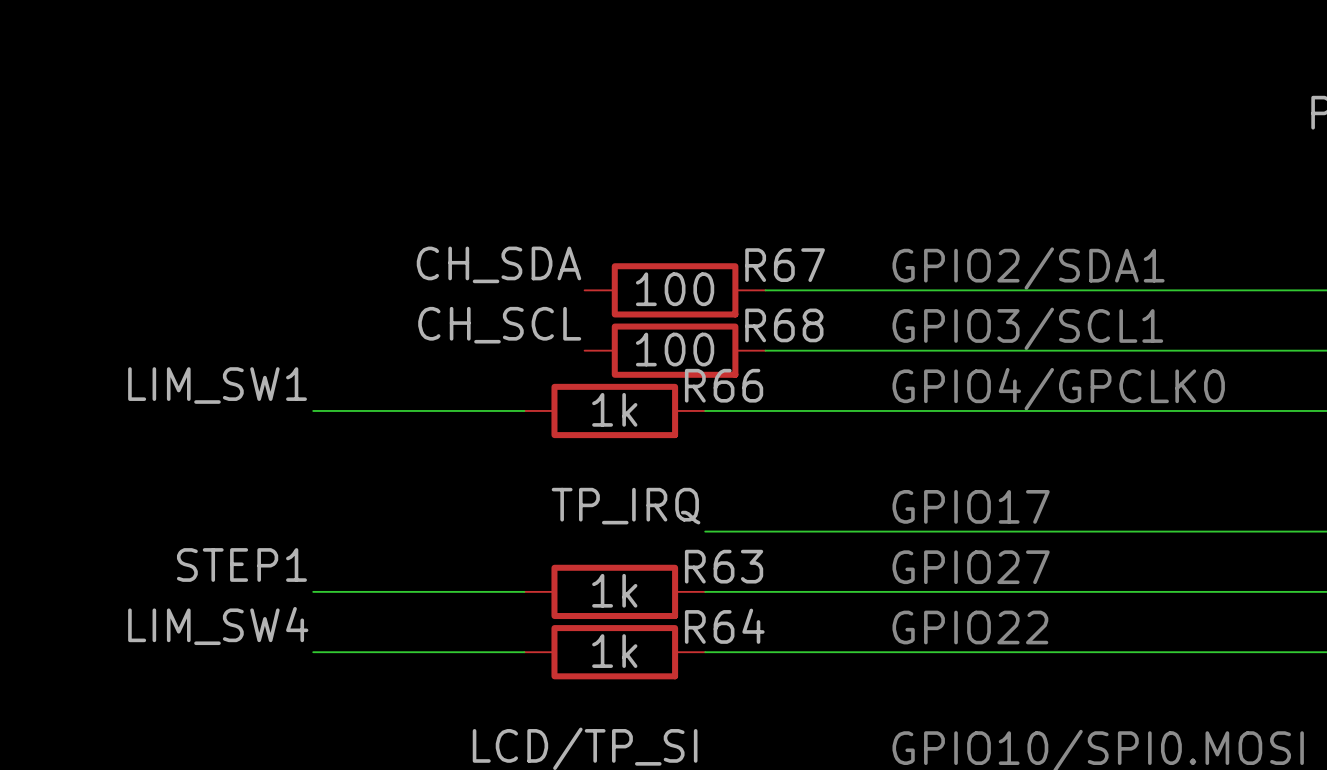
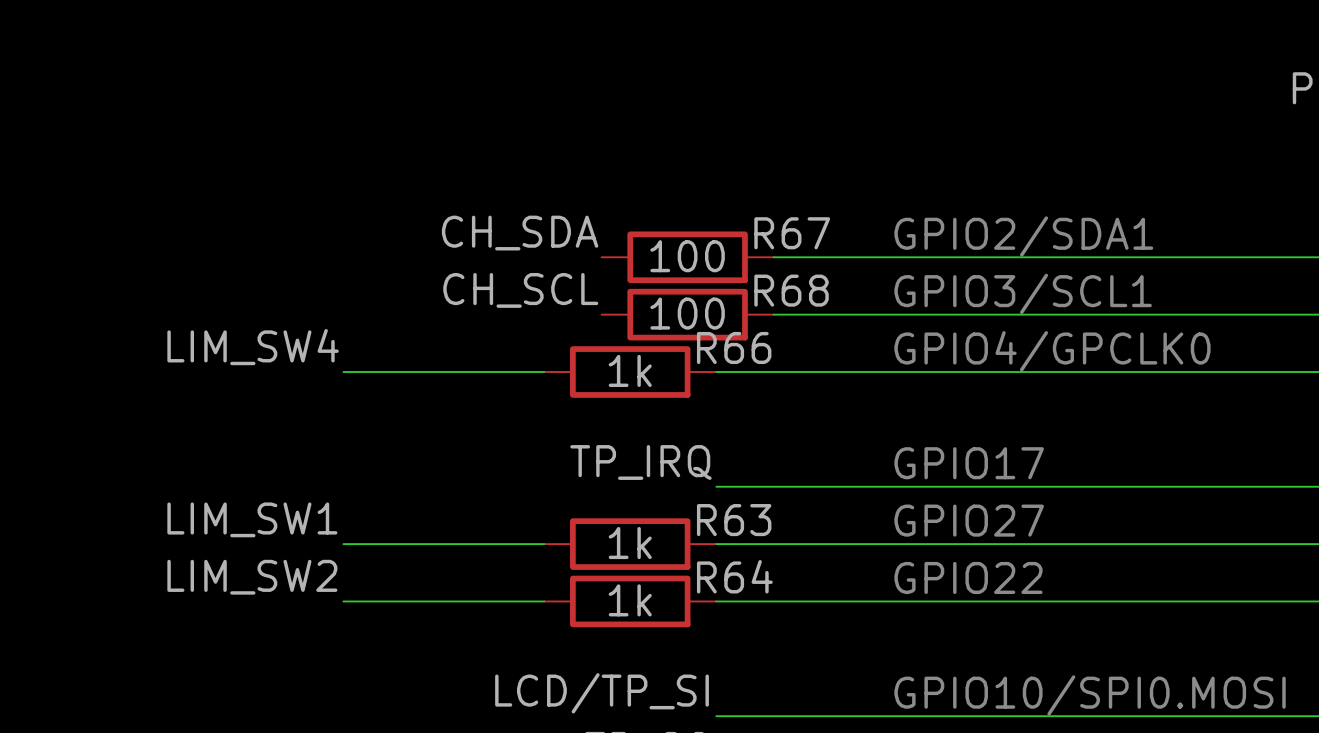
label: LIM_SW1 (217, 385) -> LIM_SW4 (253, 347)
label: STEP1 (241, 564) -> LIM_SW1 (252, 519)
label: LIM_SW4 (218, 626) -> LIM_SW2 (252, 577)

